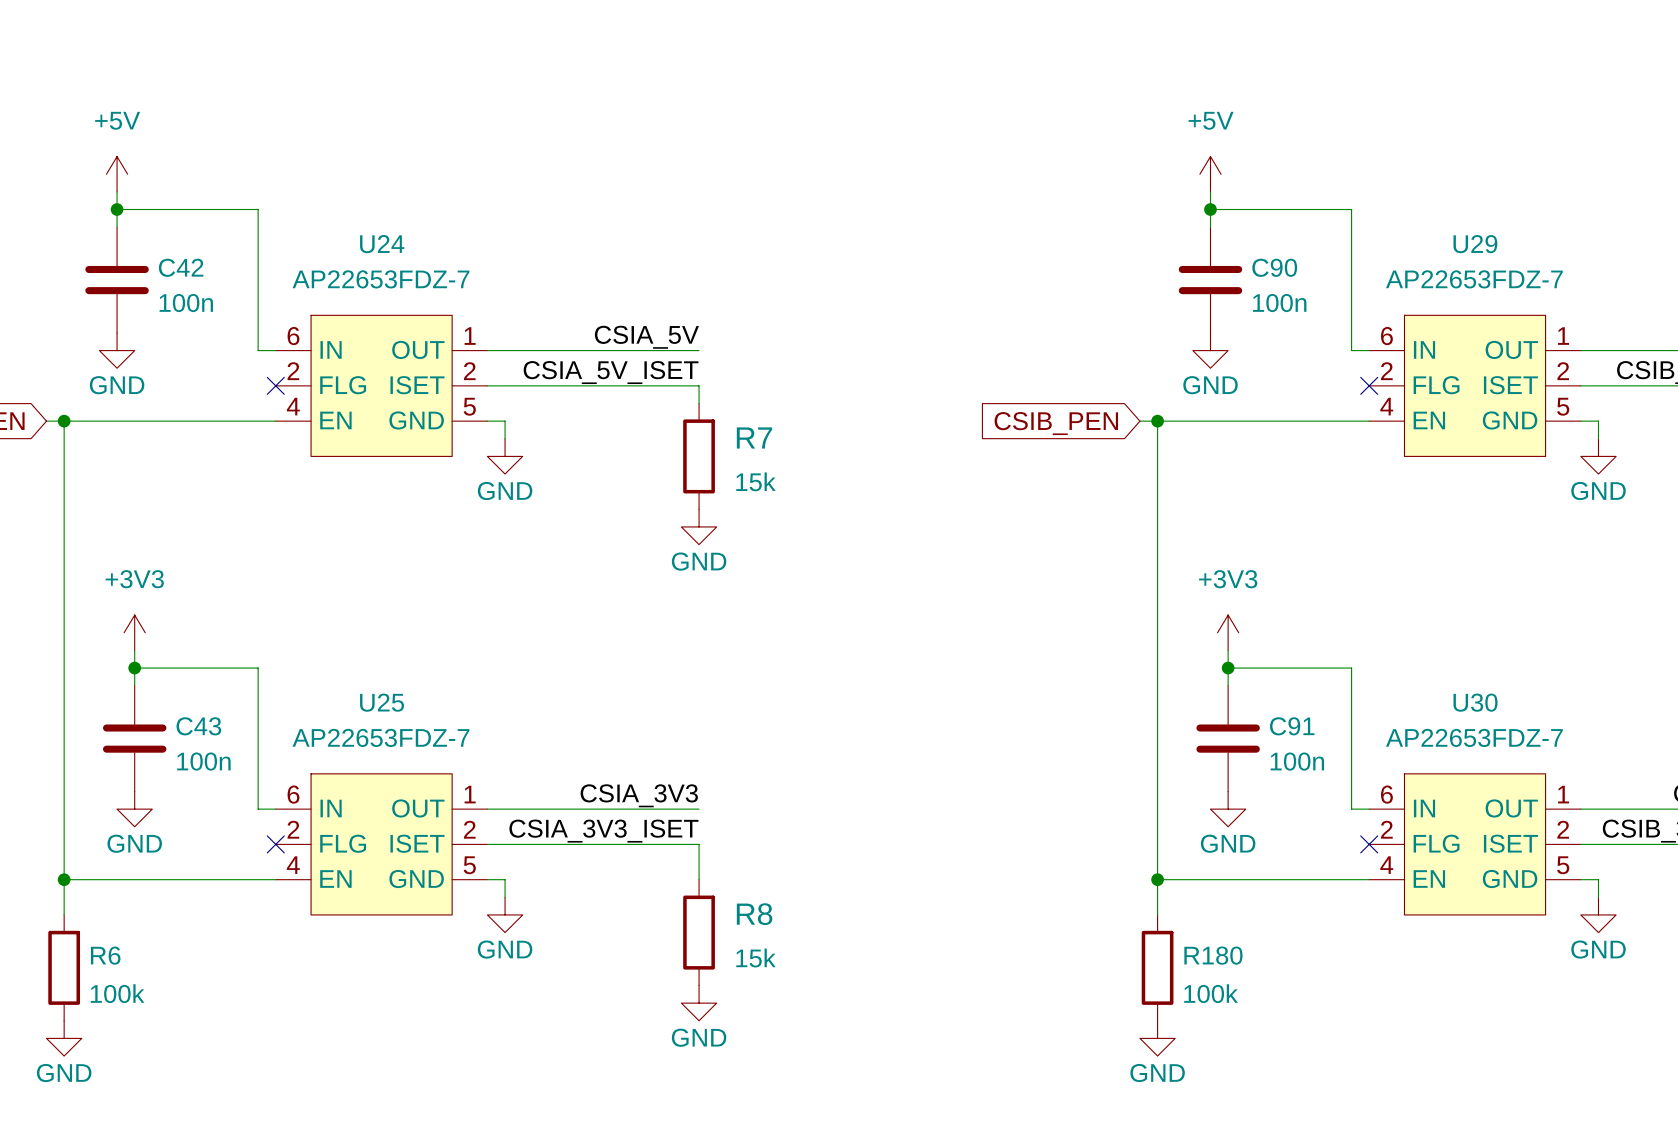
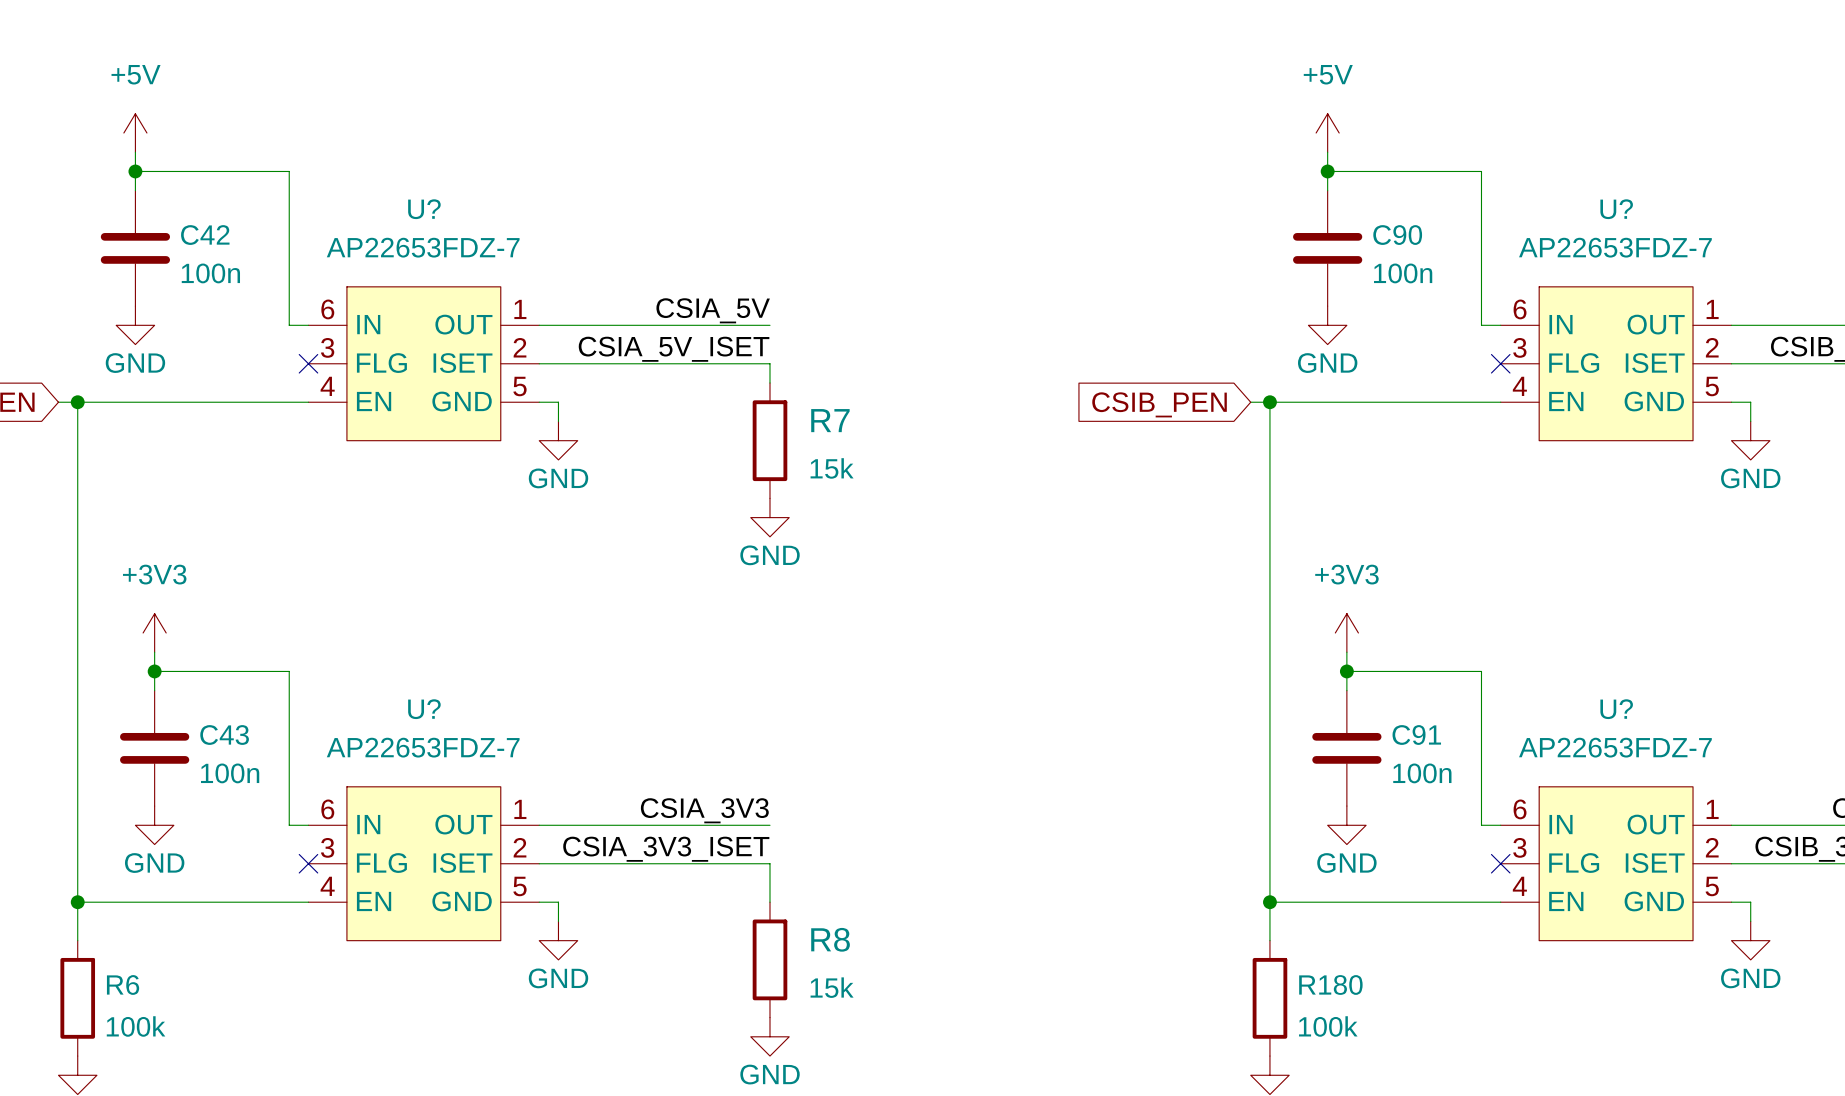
U24 name: U24 (382, 244) -> U? (424, 209)
U29 name: U29 (1475, 244) -> U? (1616, 209)
U24 pin number: 2 (293, 371) -> 3 (327, 347)
U29 pin number: 2 (1386, 371) -> 3 (1519, 347)
U25 name: U25 (382, 702) -> U? (424, 709)
U30 name: U30 (1475, 702) -> U? (1616, 709)
U25 pin number: 2 (293, 829) -> 3 (327, 847)
U30 pin number: 2 (1386, 829) -> 3 (1519, 847)

